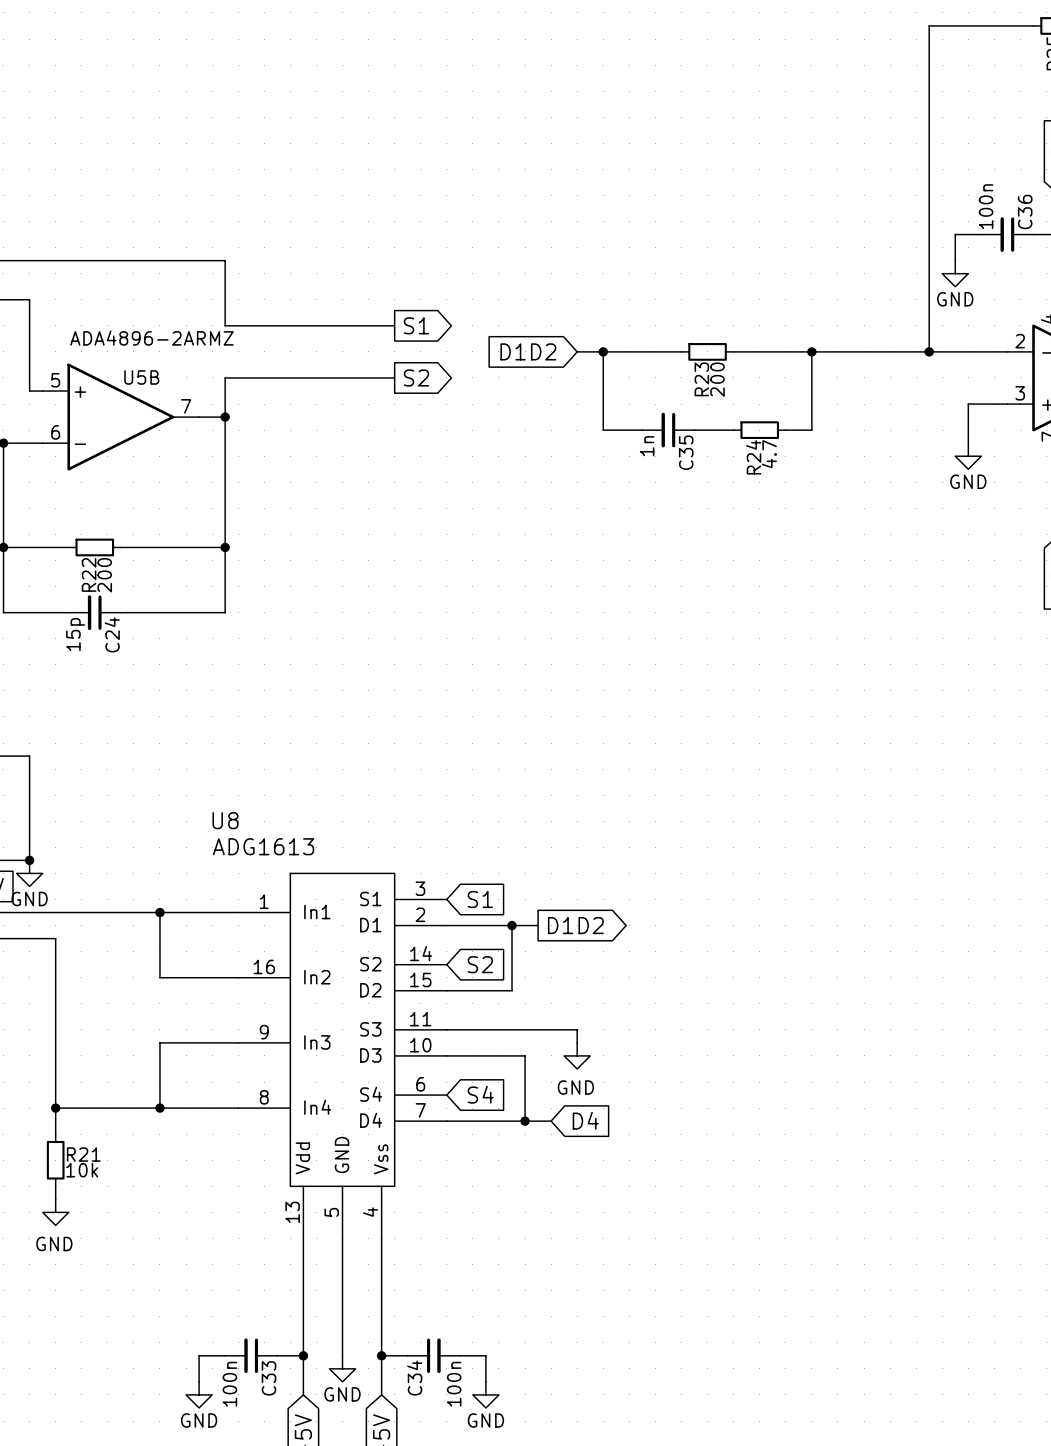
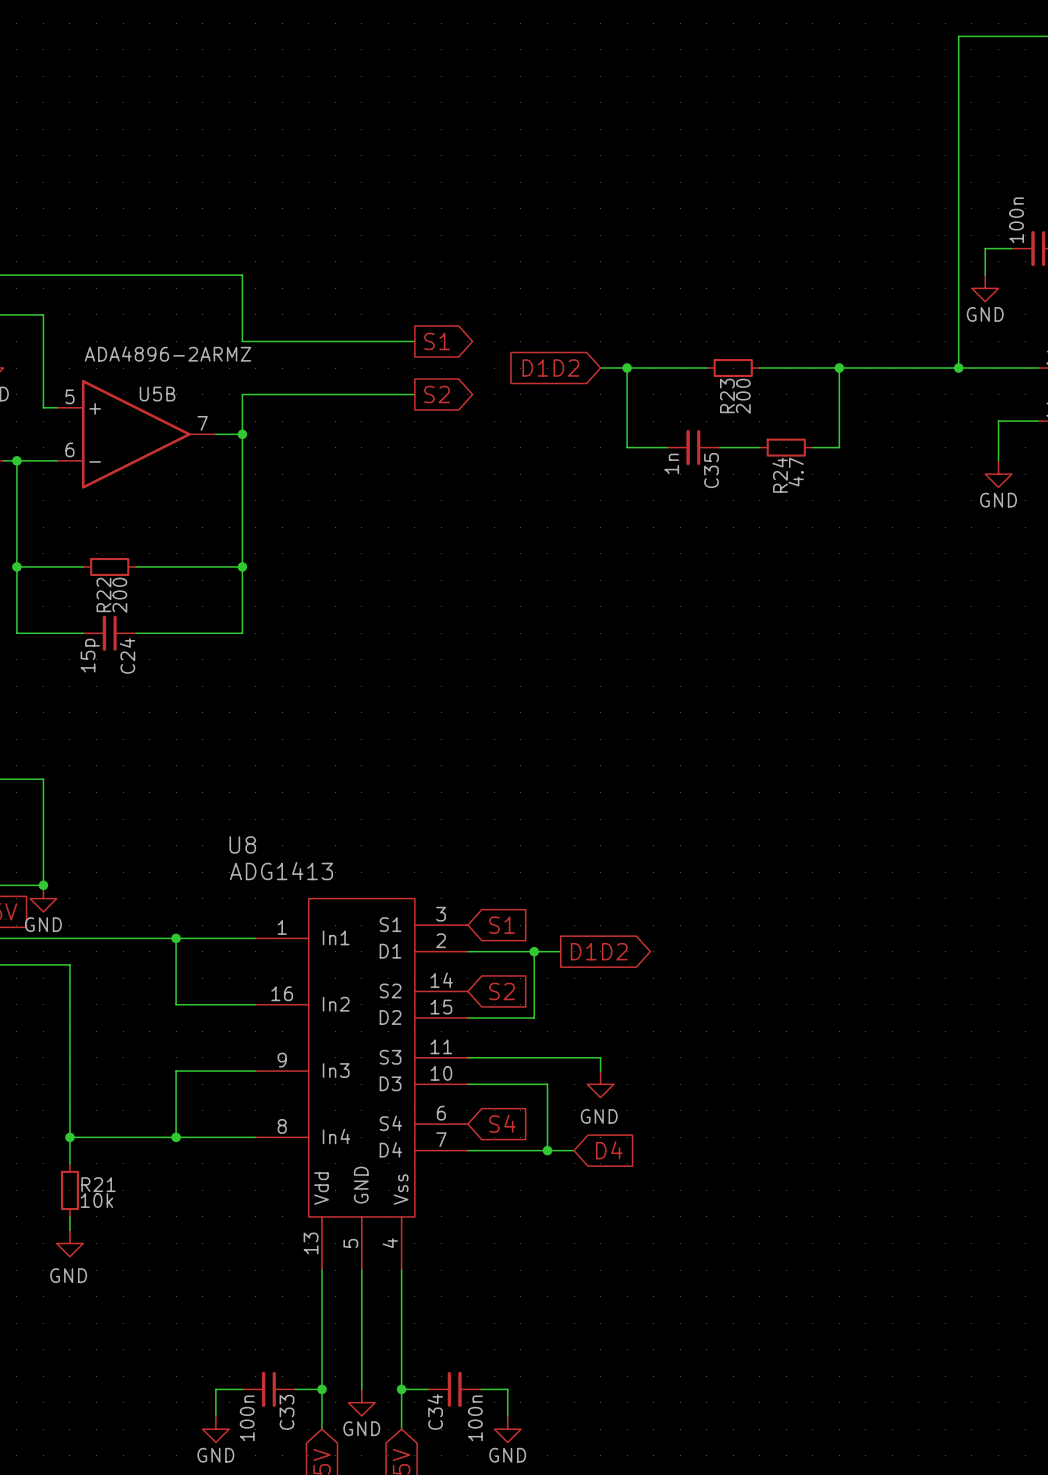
U8 value: ADG1613 (263, 846) -> ADG1413 (281, 871)

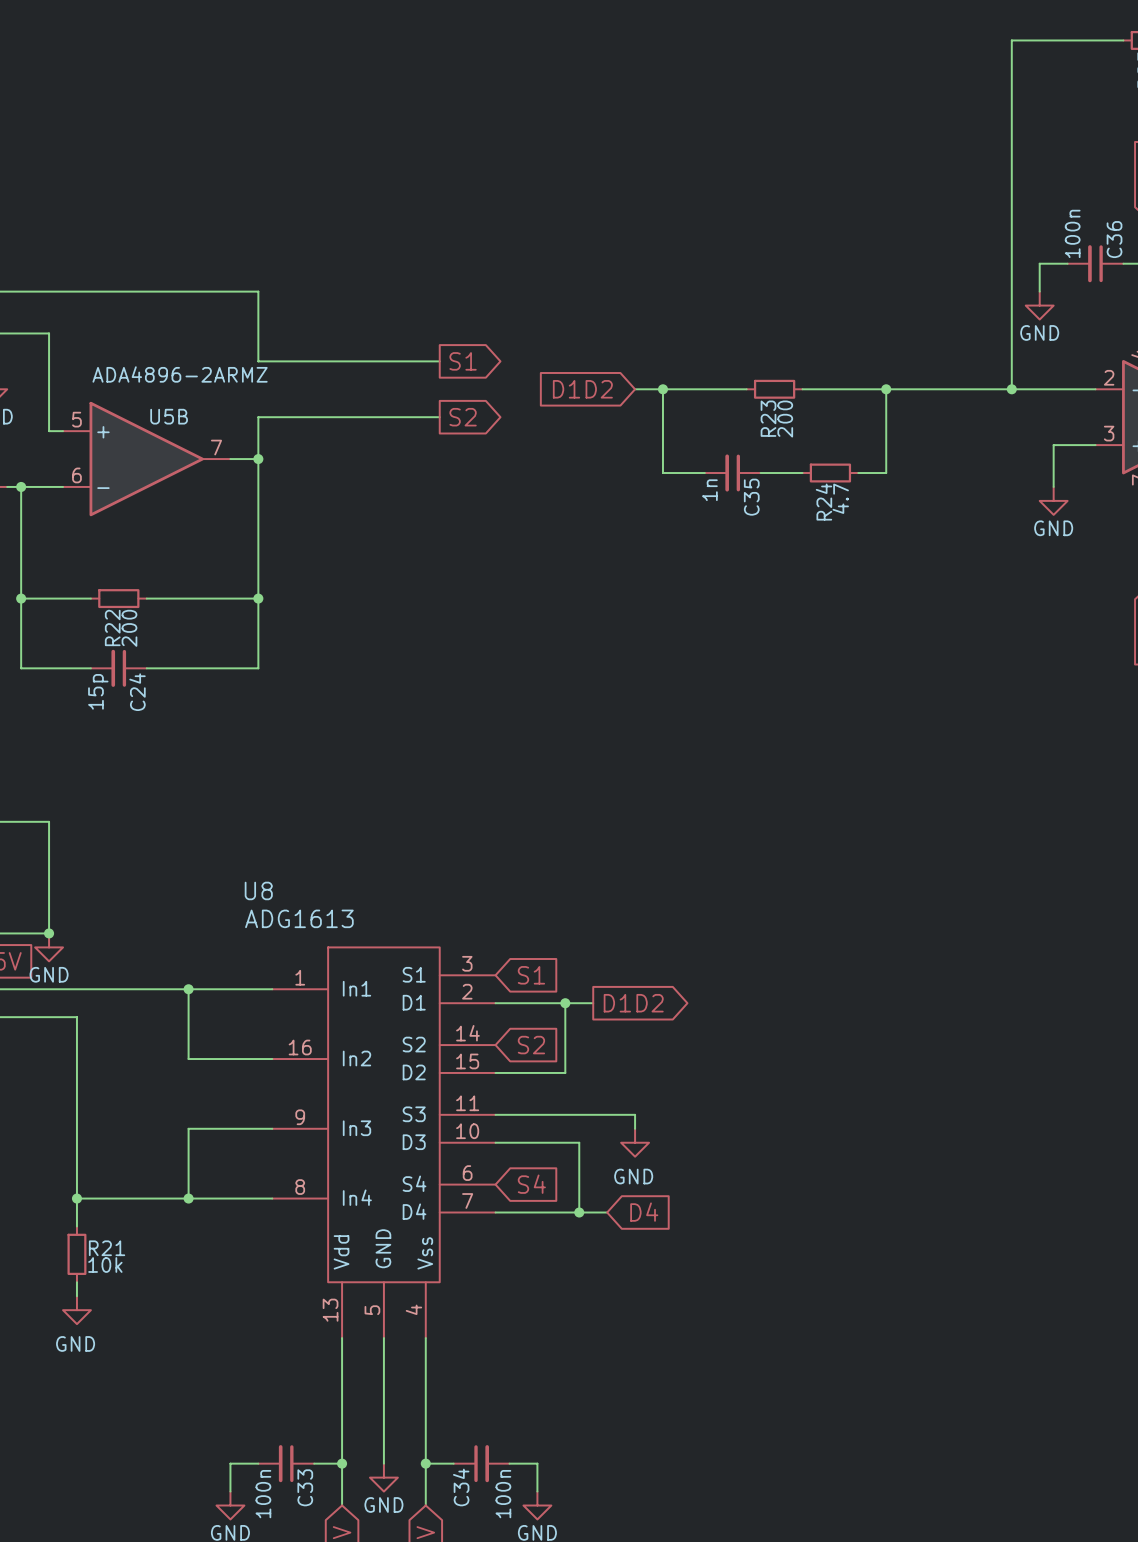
U8 value: ADG1413 (281, 871) -> ADG1613 (299, 918)

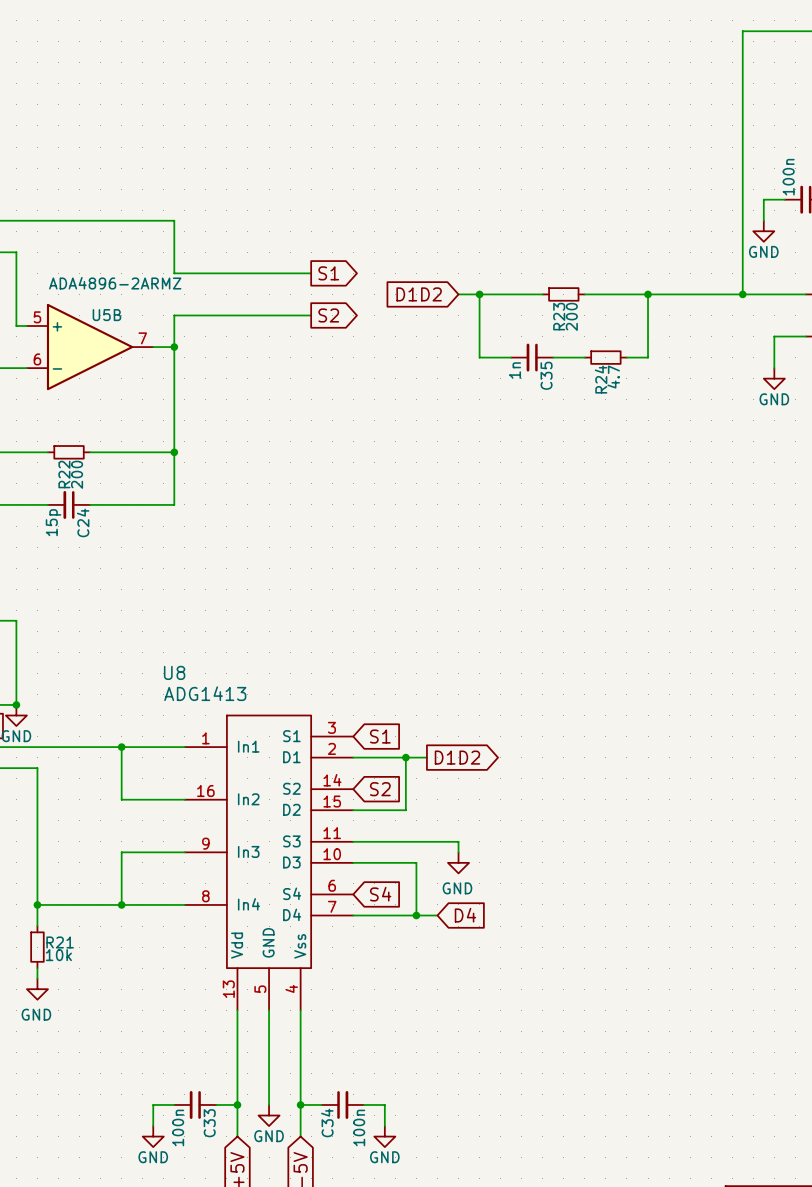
U8 value: ADG1613 (299, 918) -> ADG1413 (205, 693)

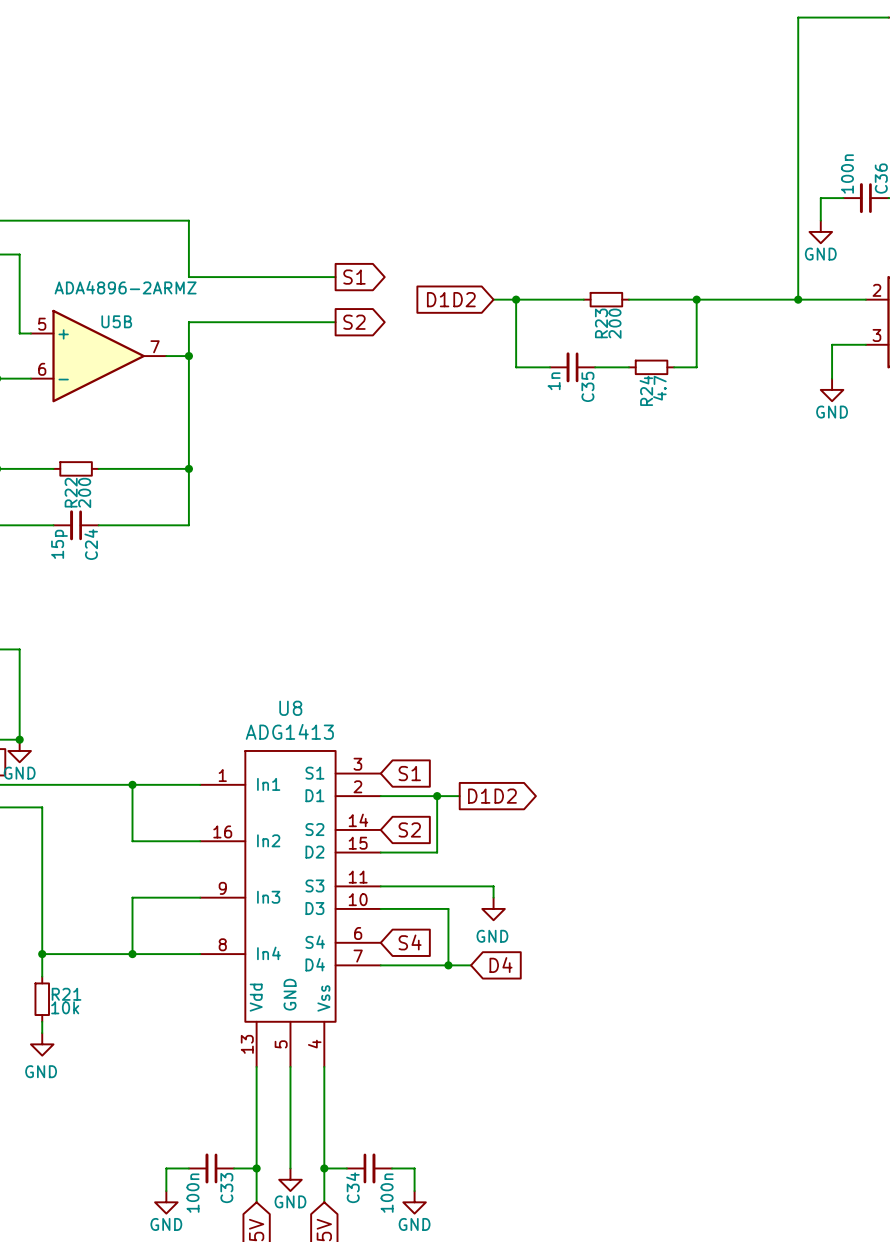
U8 name position: U8 (174, 672) -> U8 (290, 708)
U8 value position: ADG1413 (205, 693) -> ADG1413 (289, 731)

